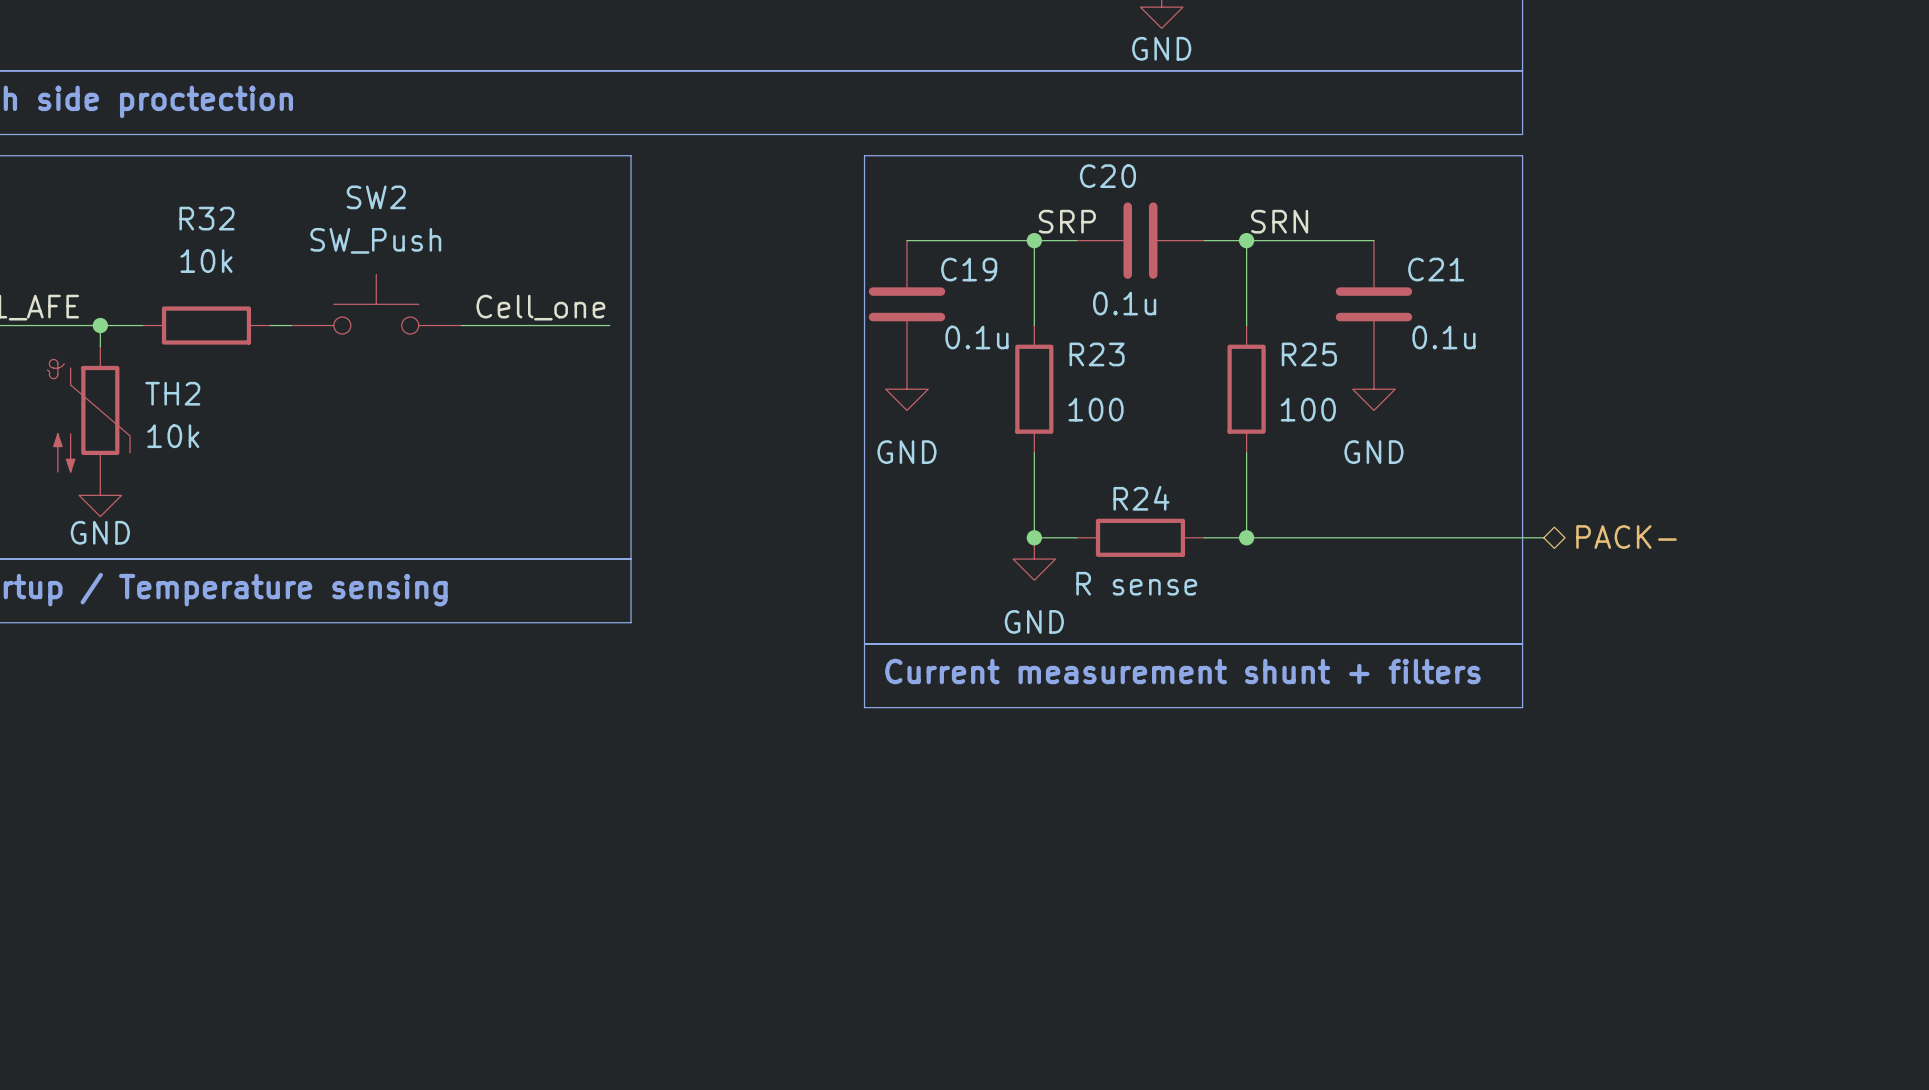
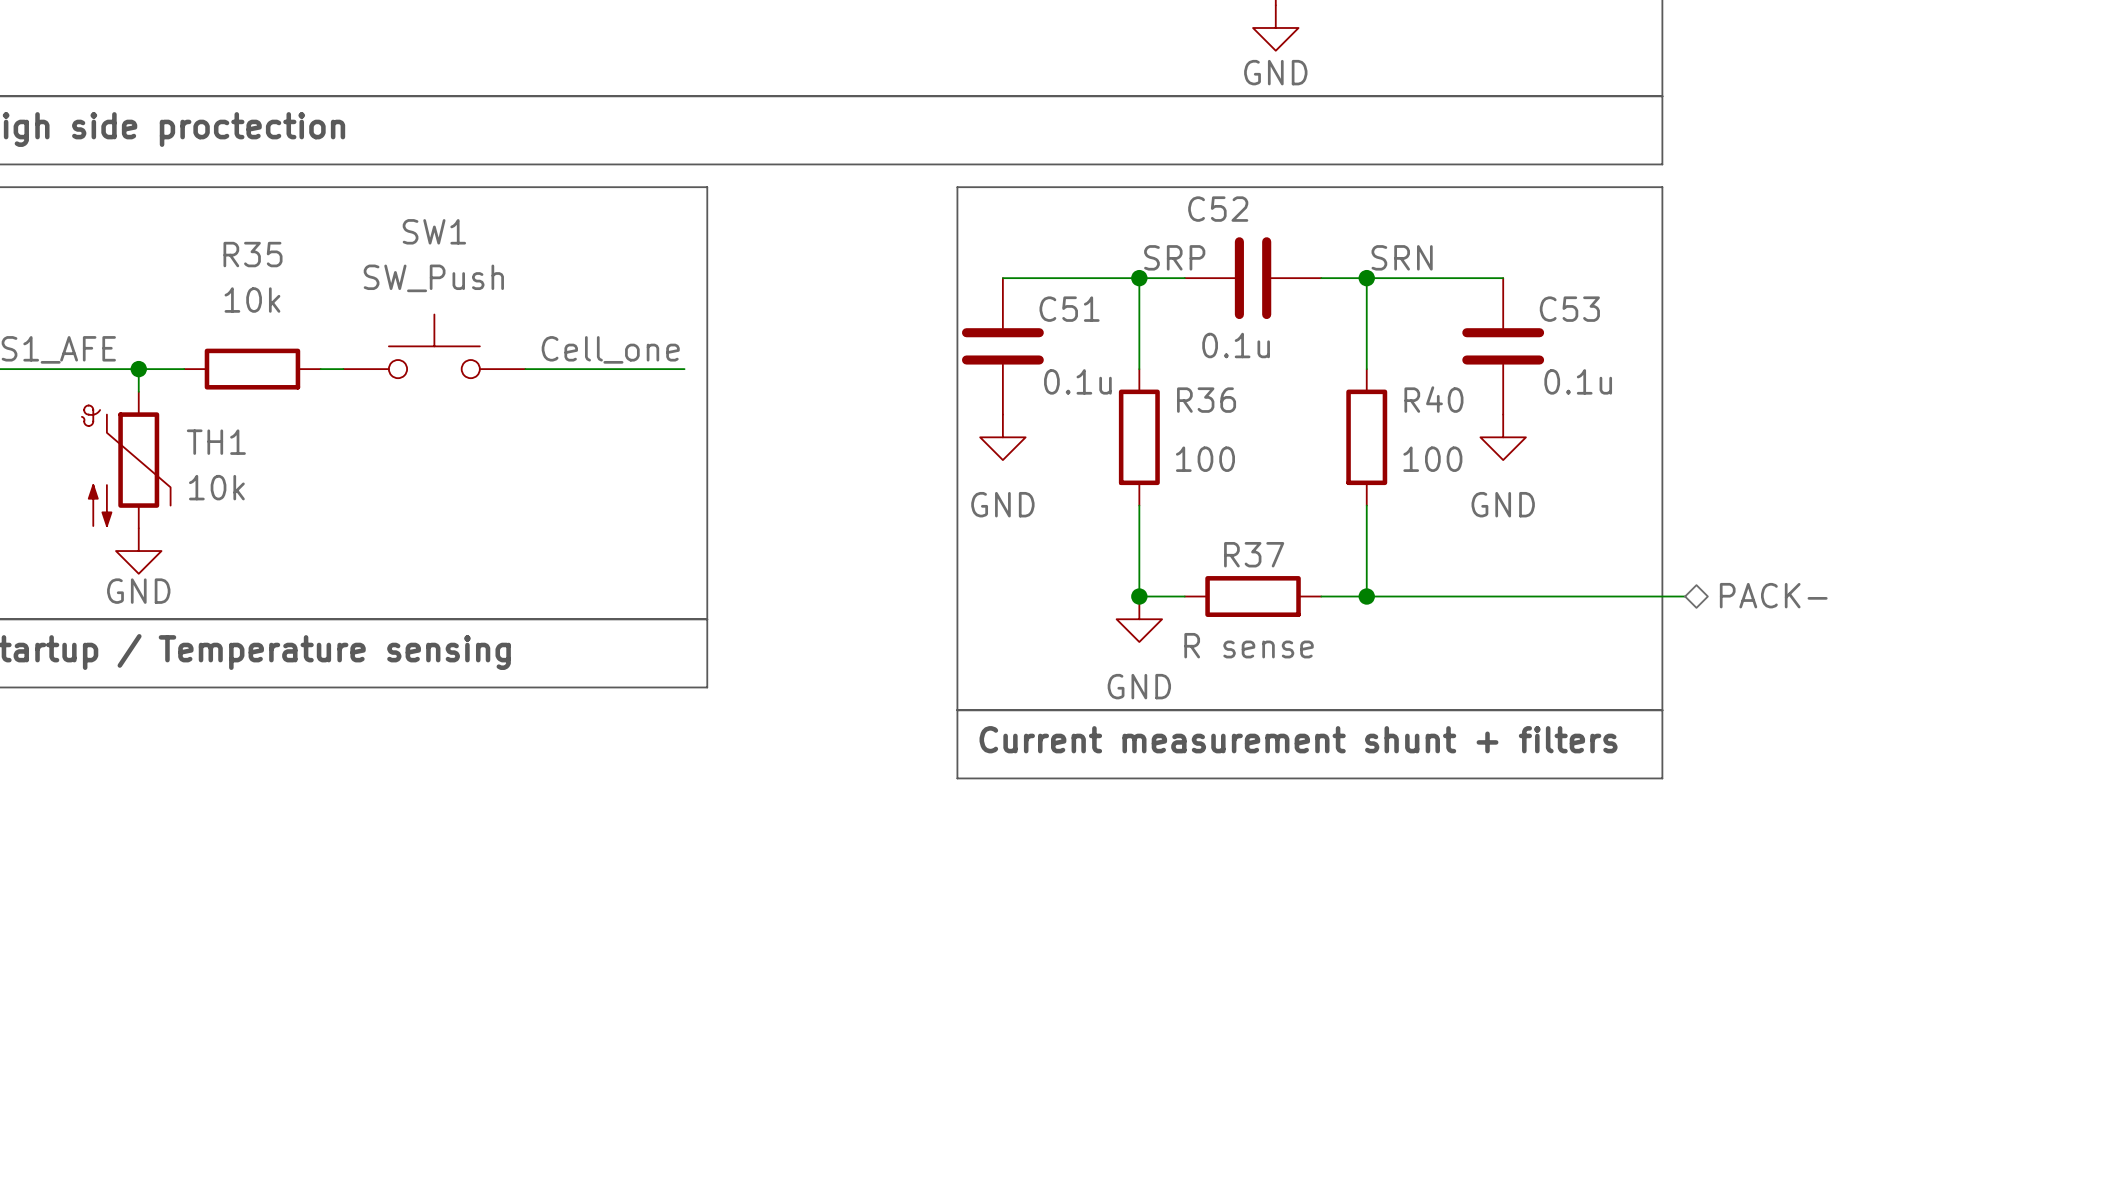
C20 name: C20 (1107, 176) -> C52 (1218, 209)
SW2 name: SW2 (376, 197) -> SW1 (434, 231)
R32 name: R32 (206, 218) -> R35 (253, 254)
C19 name: C19 (969, 269) -> C51 (1069, 309)
C21 name: C21 (1436, 269) -> C53 (1569, 309)
R23 name: R23 (1097, 354) -> R36 (1206, 400)
R25 name: R25 (1309, 354) -> R40 (1433, 399)
TH2 name: TH2 (172, 393) -> TH1 (216, 442)
R24 name: R24 (1141, 498) -> R37 (1254, 554)

